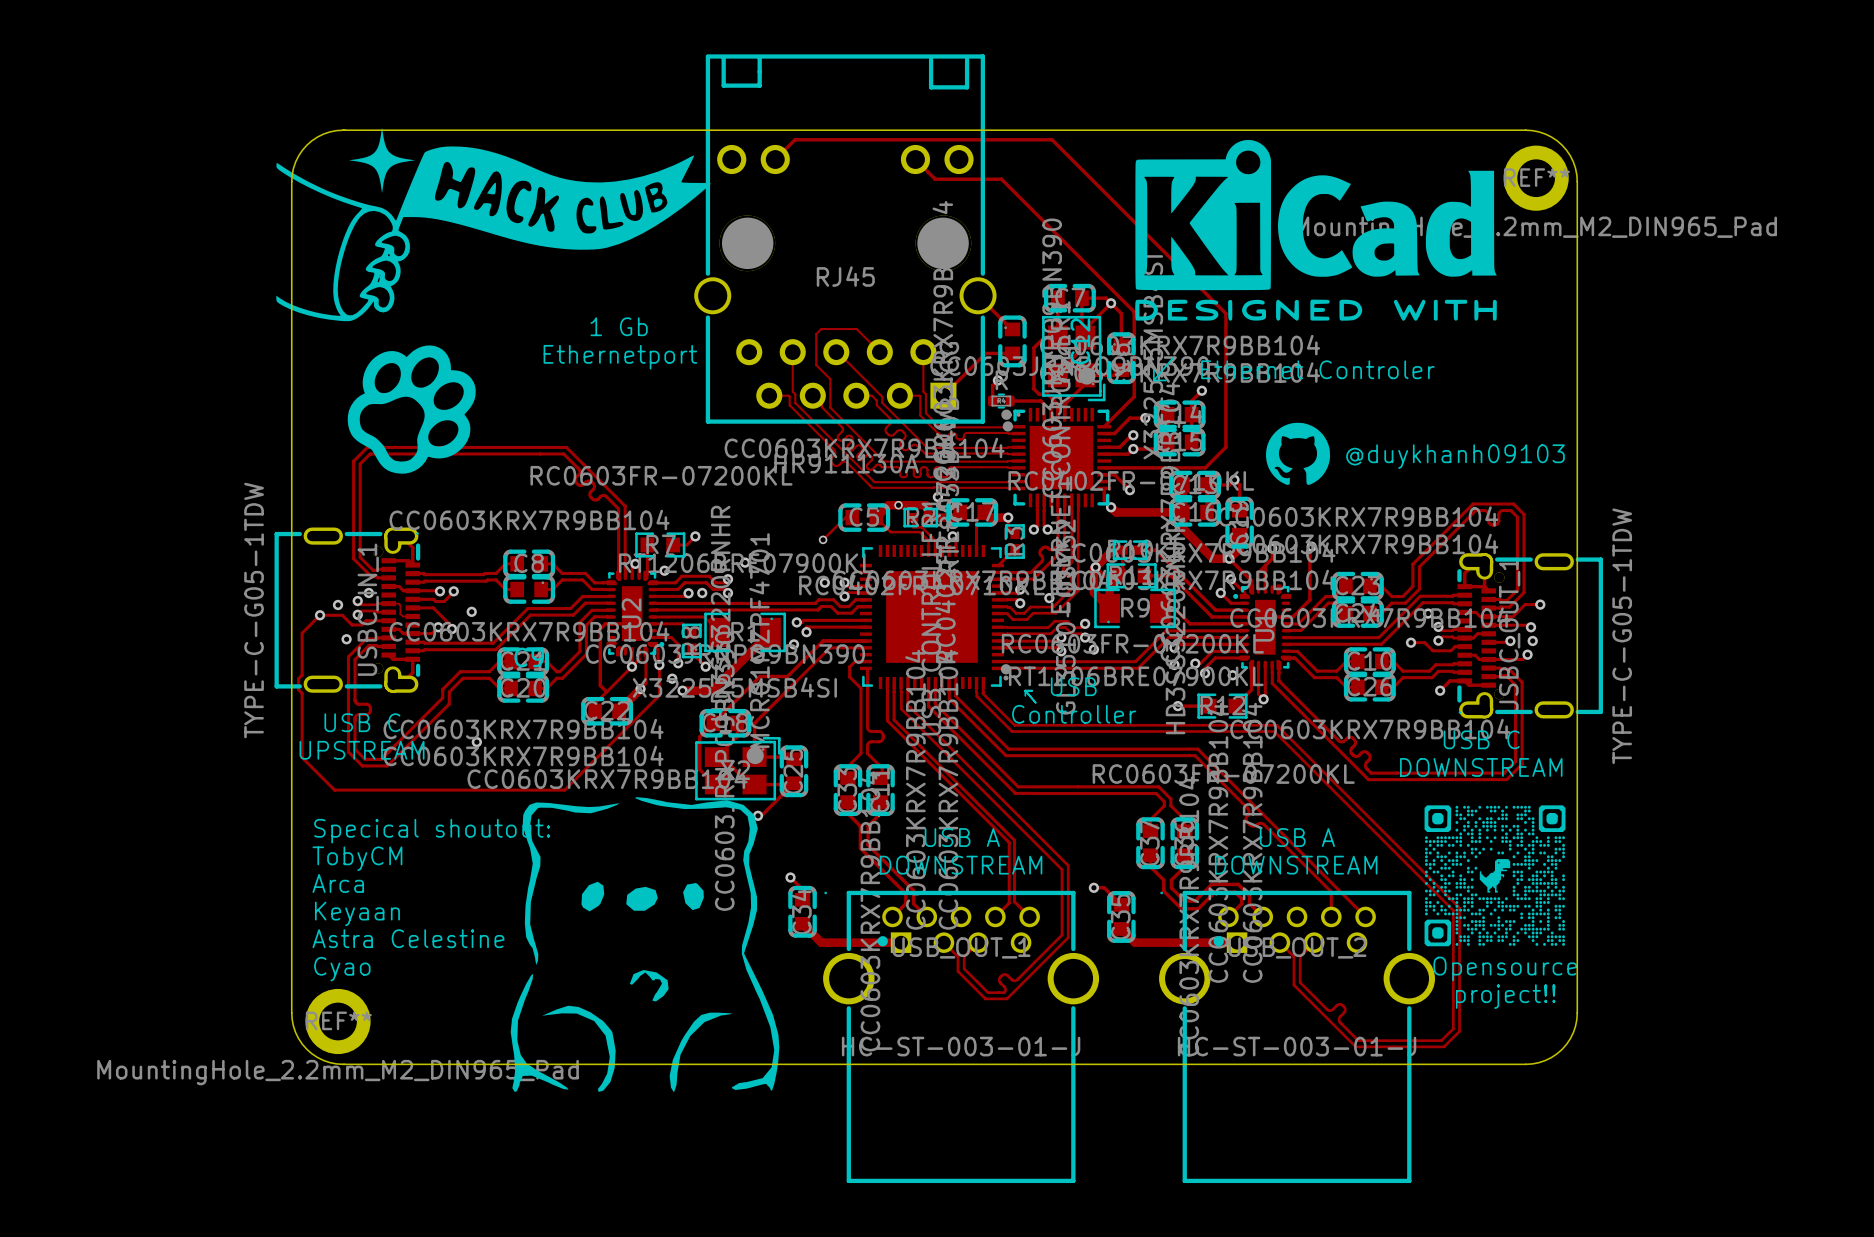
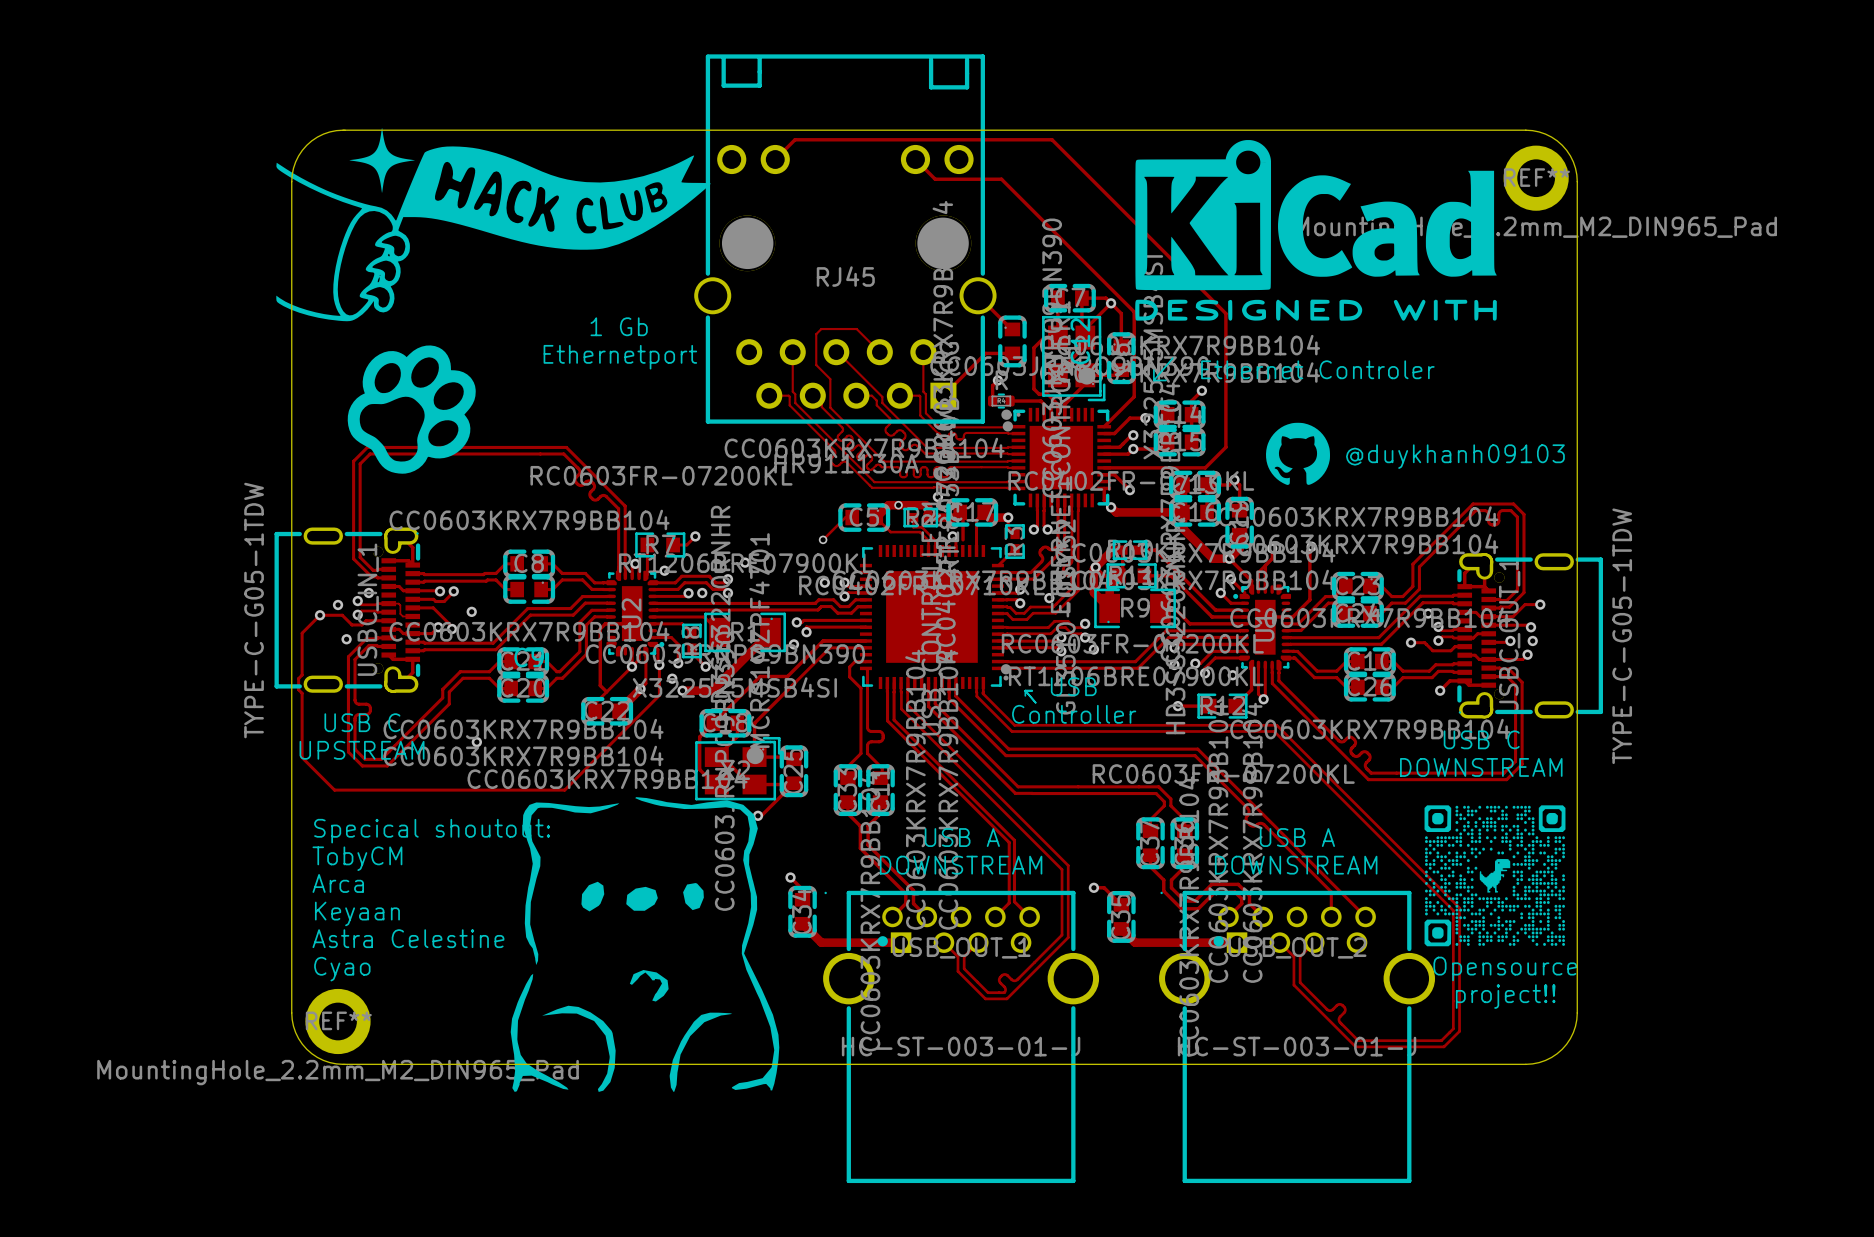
track: none -> (960, 512) (963, 515) (963, 539)

